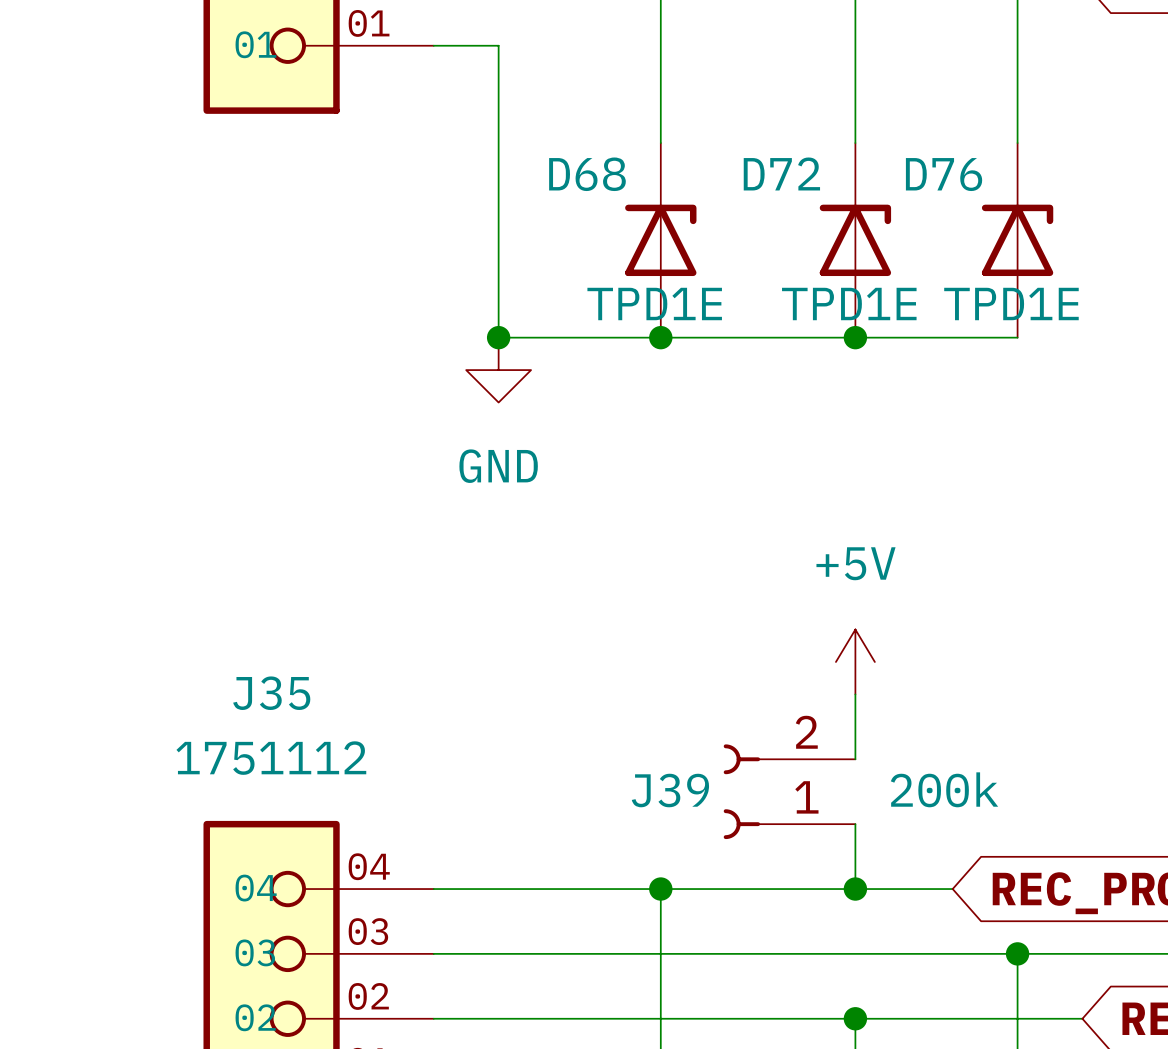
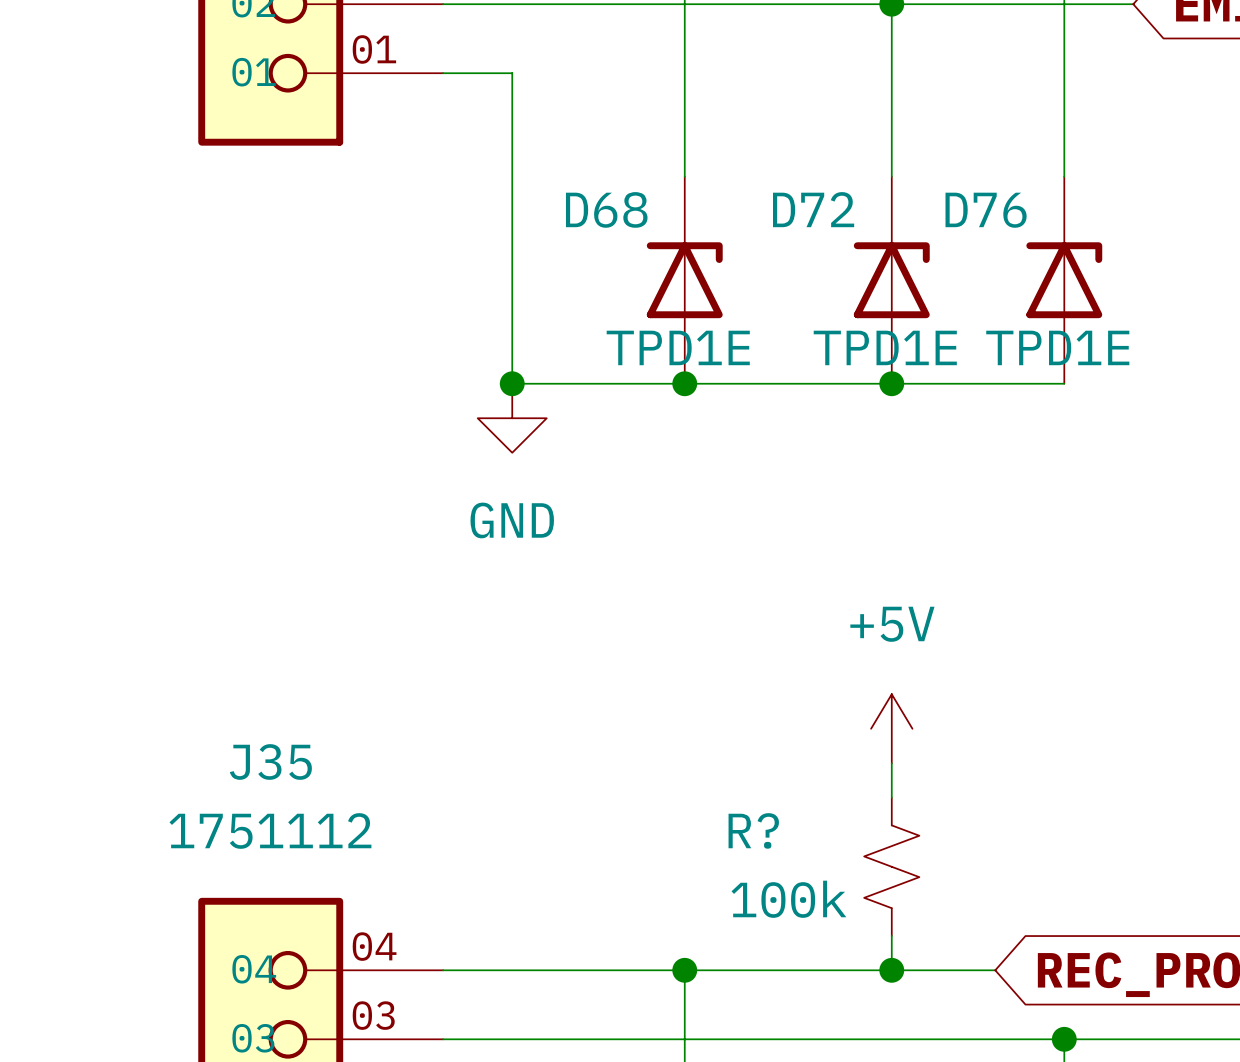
J39: 200k (789, 791) -> none
R?: none -> 100k (891, 866)

